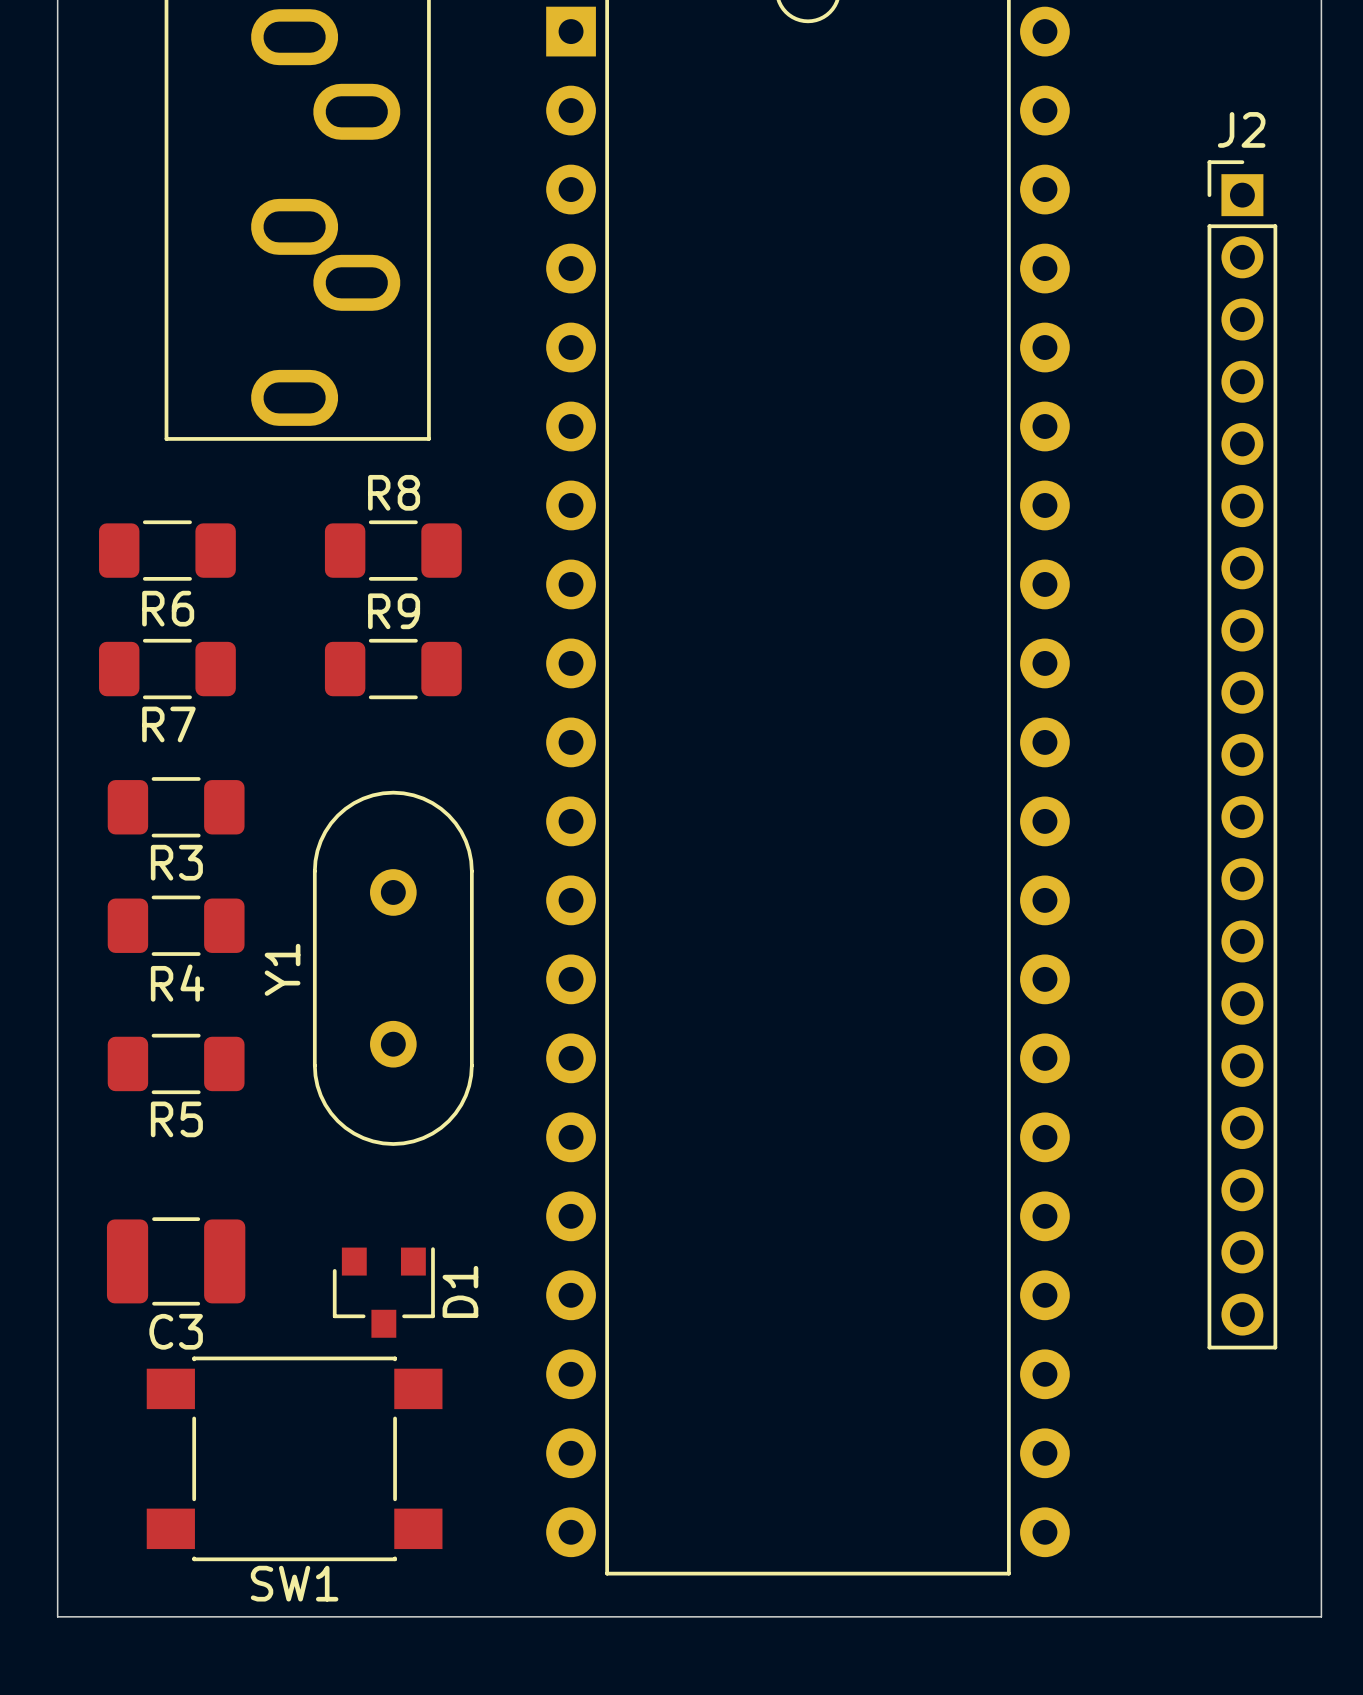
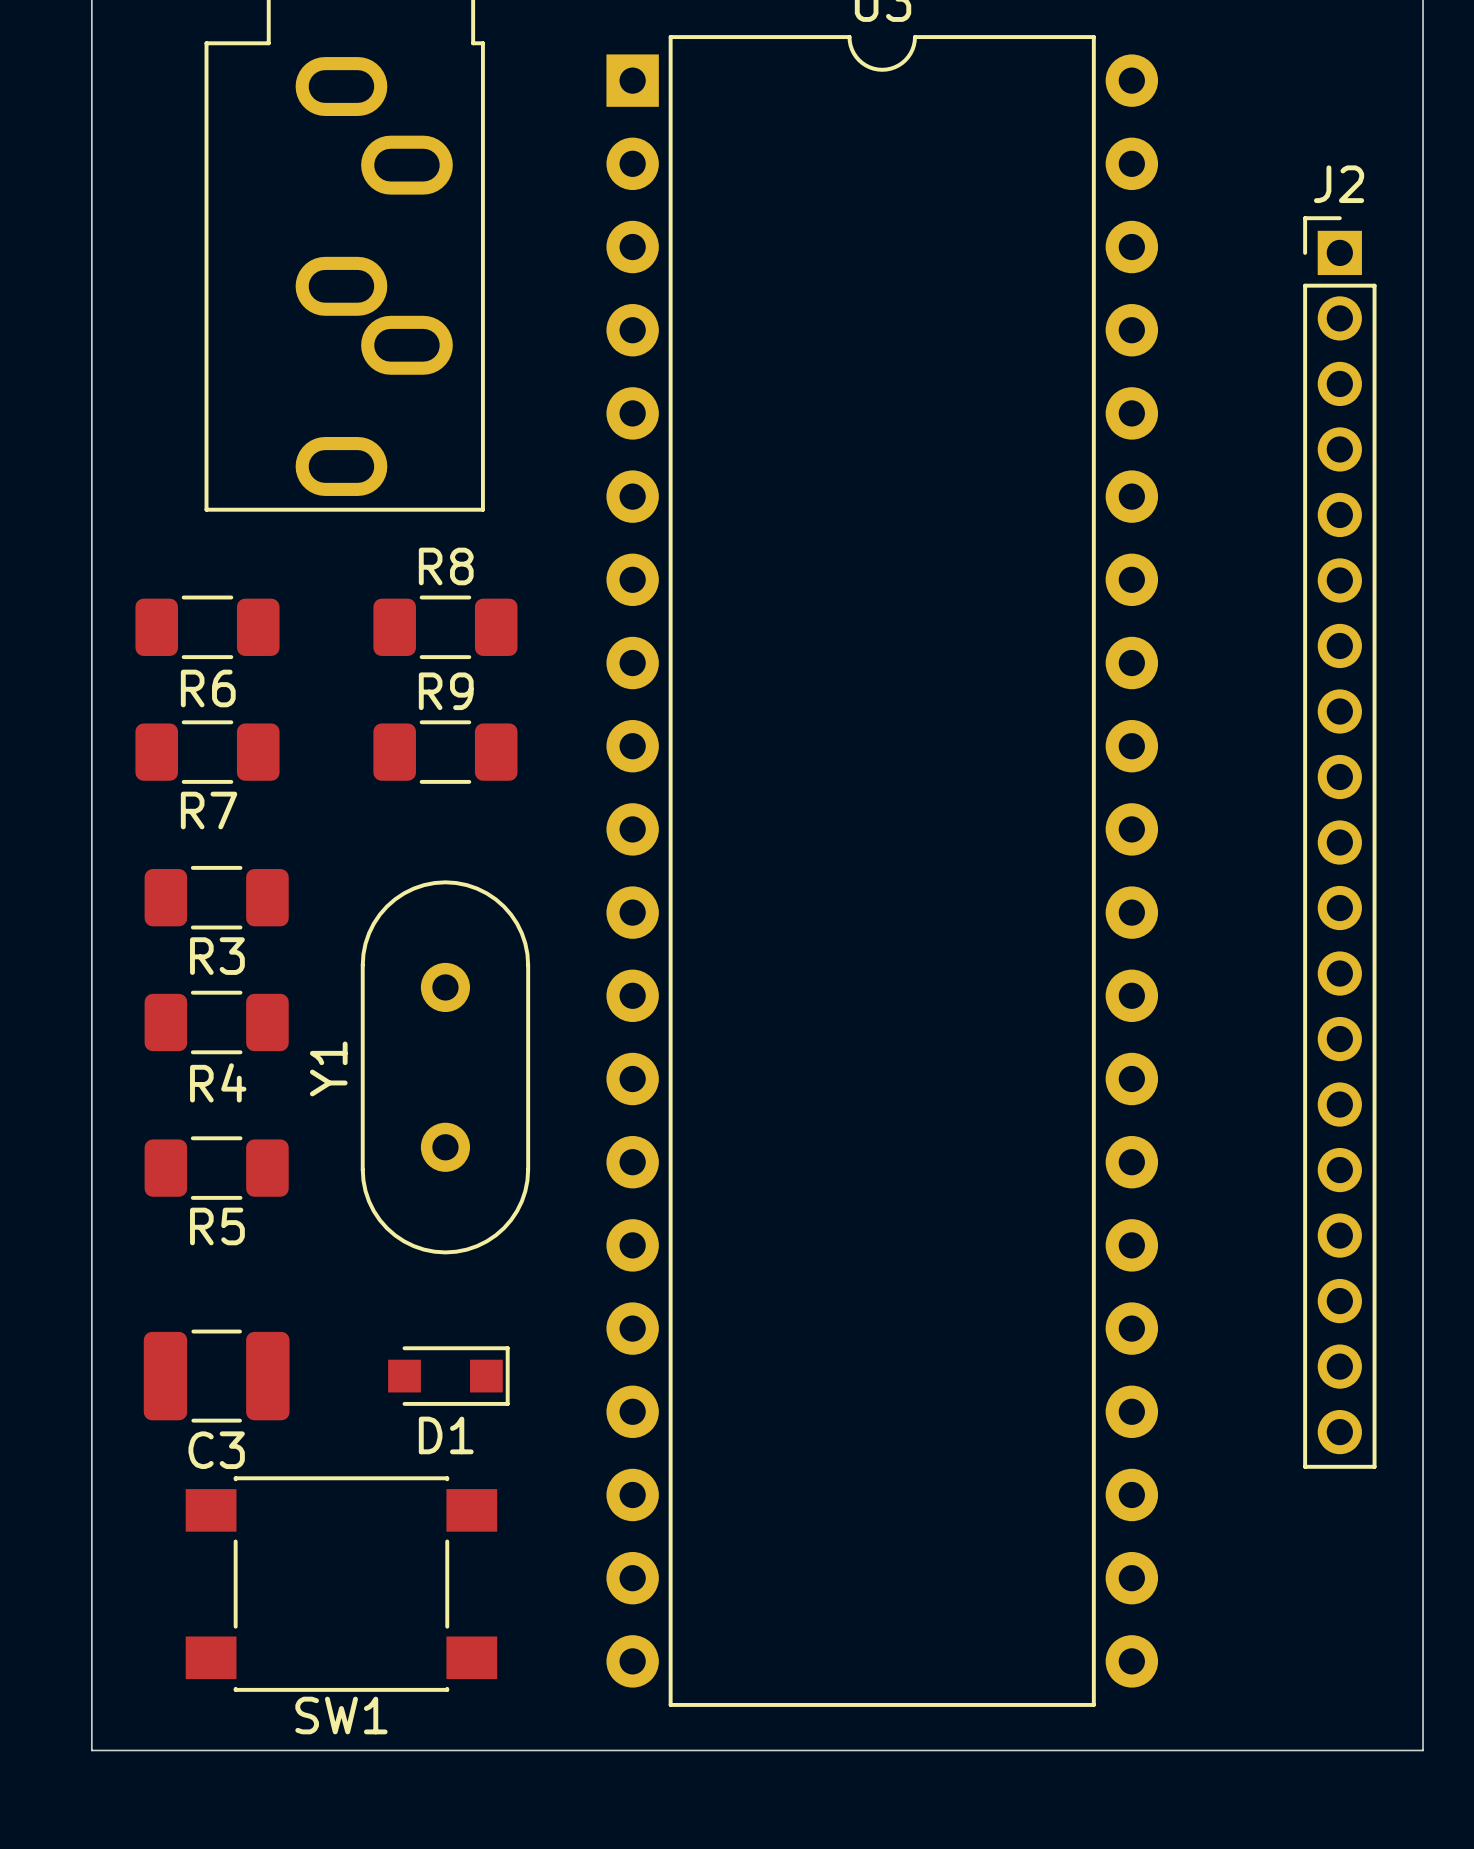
D1 footprint: [332, 1247, 435, 1338] -> [388, 1346, 510, 1406]
D1 name position: D1 (460, 1291) -> D1 (446, 1435)

